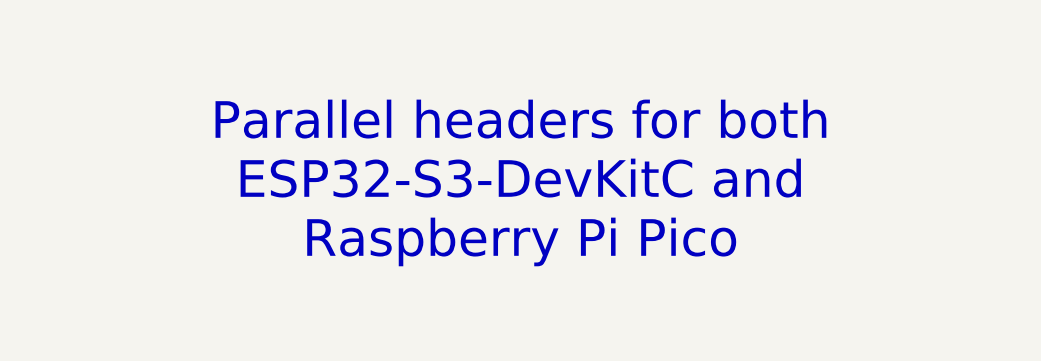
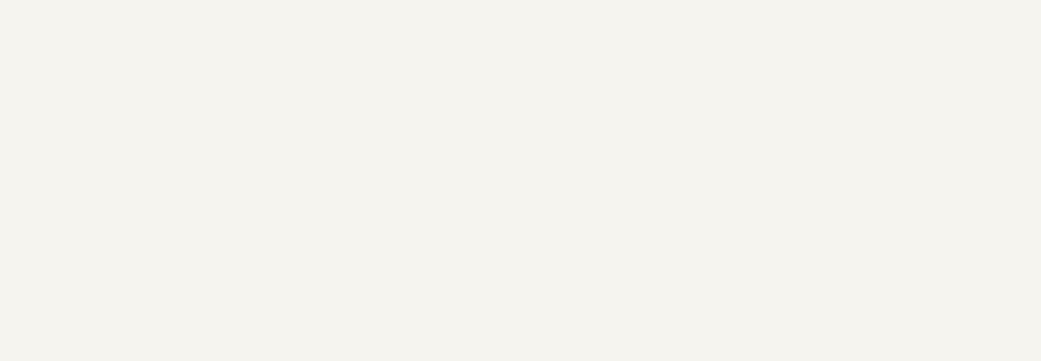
text: Parallel headers for both (520, 119) -> none
text: ESP32-S3-DevKitC and (520, 178) -> none
text: Raspberry Pi Pico (521, 241) -> none

